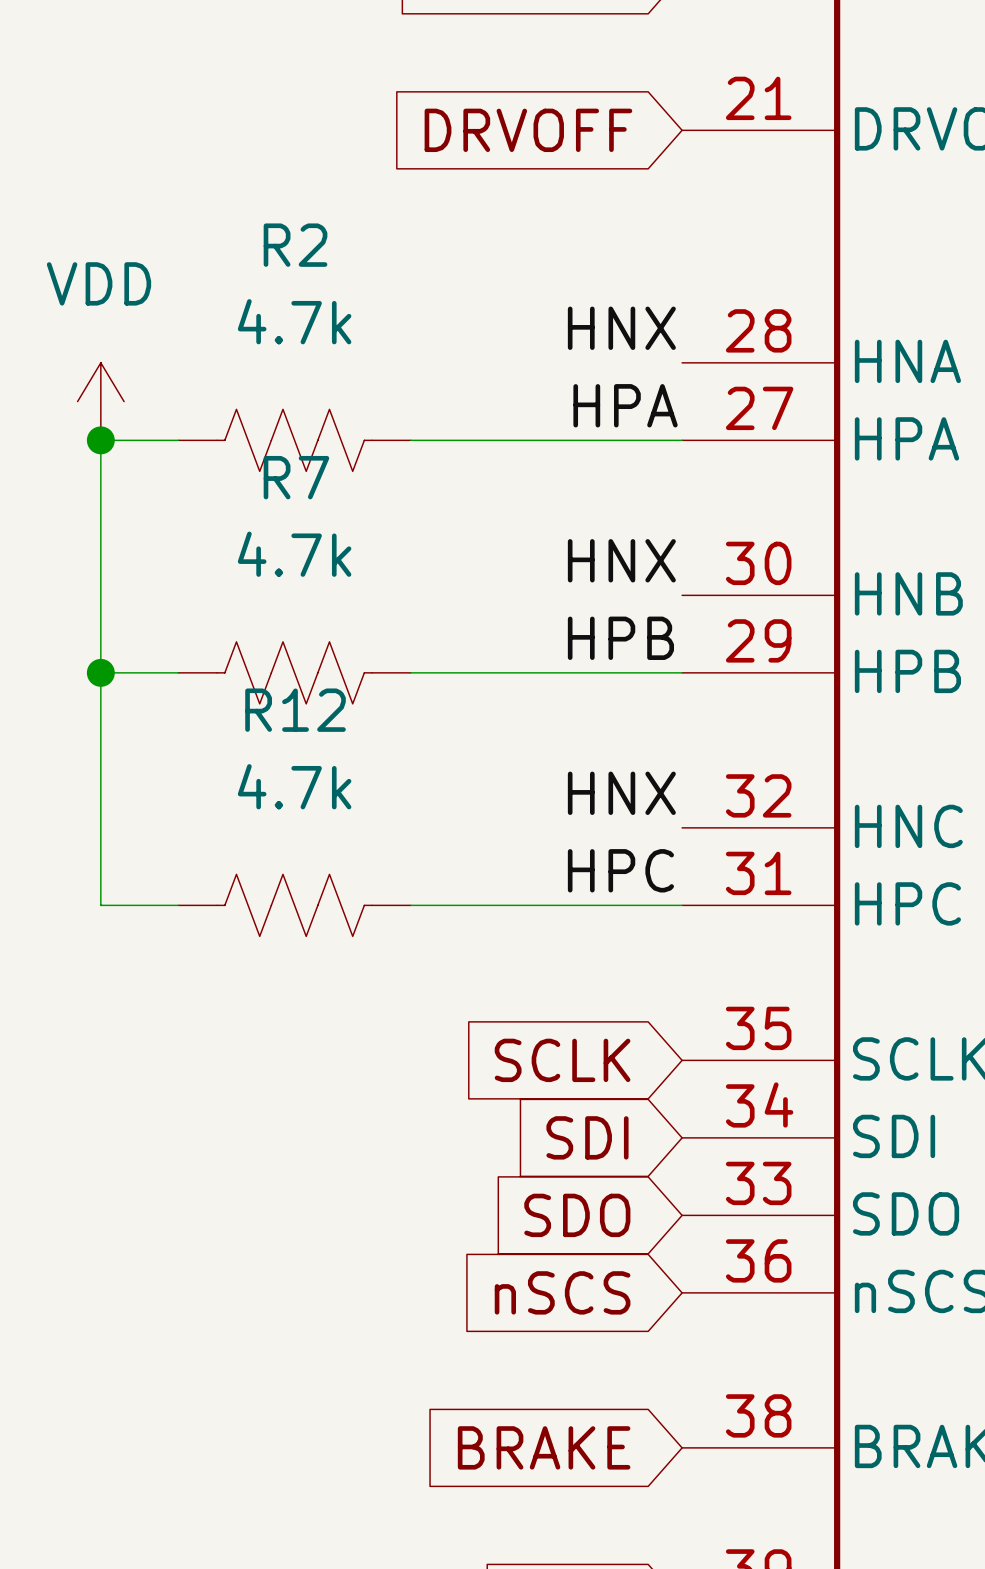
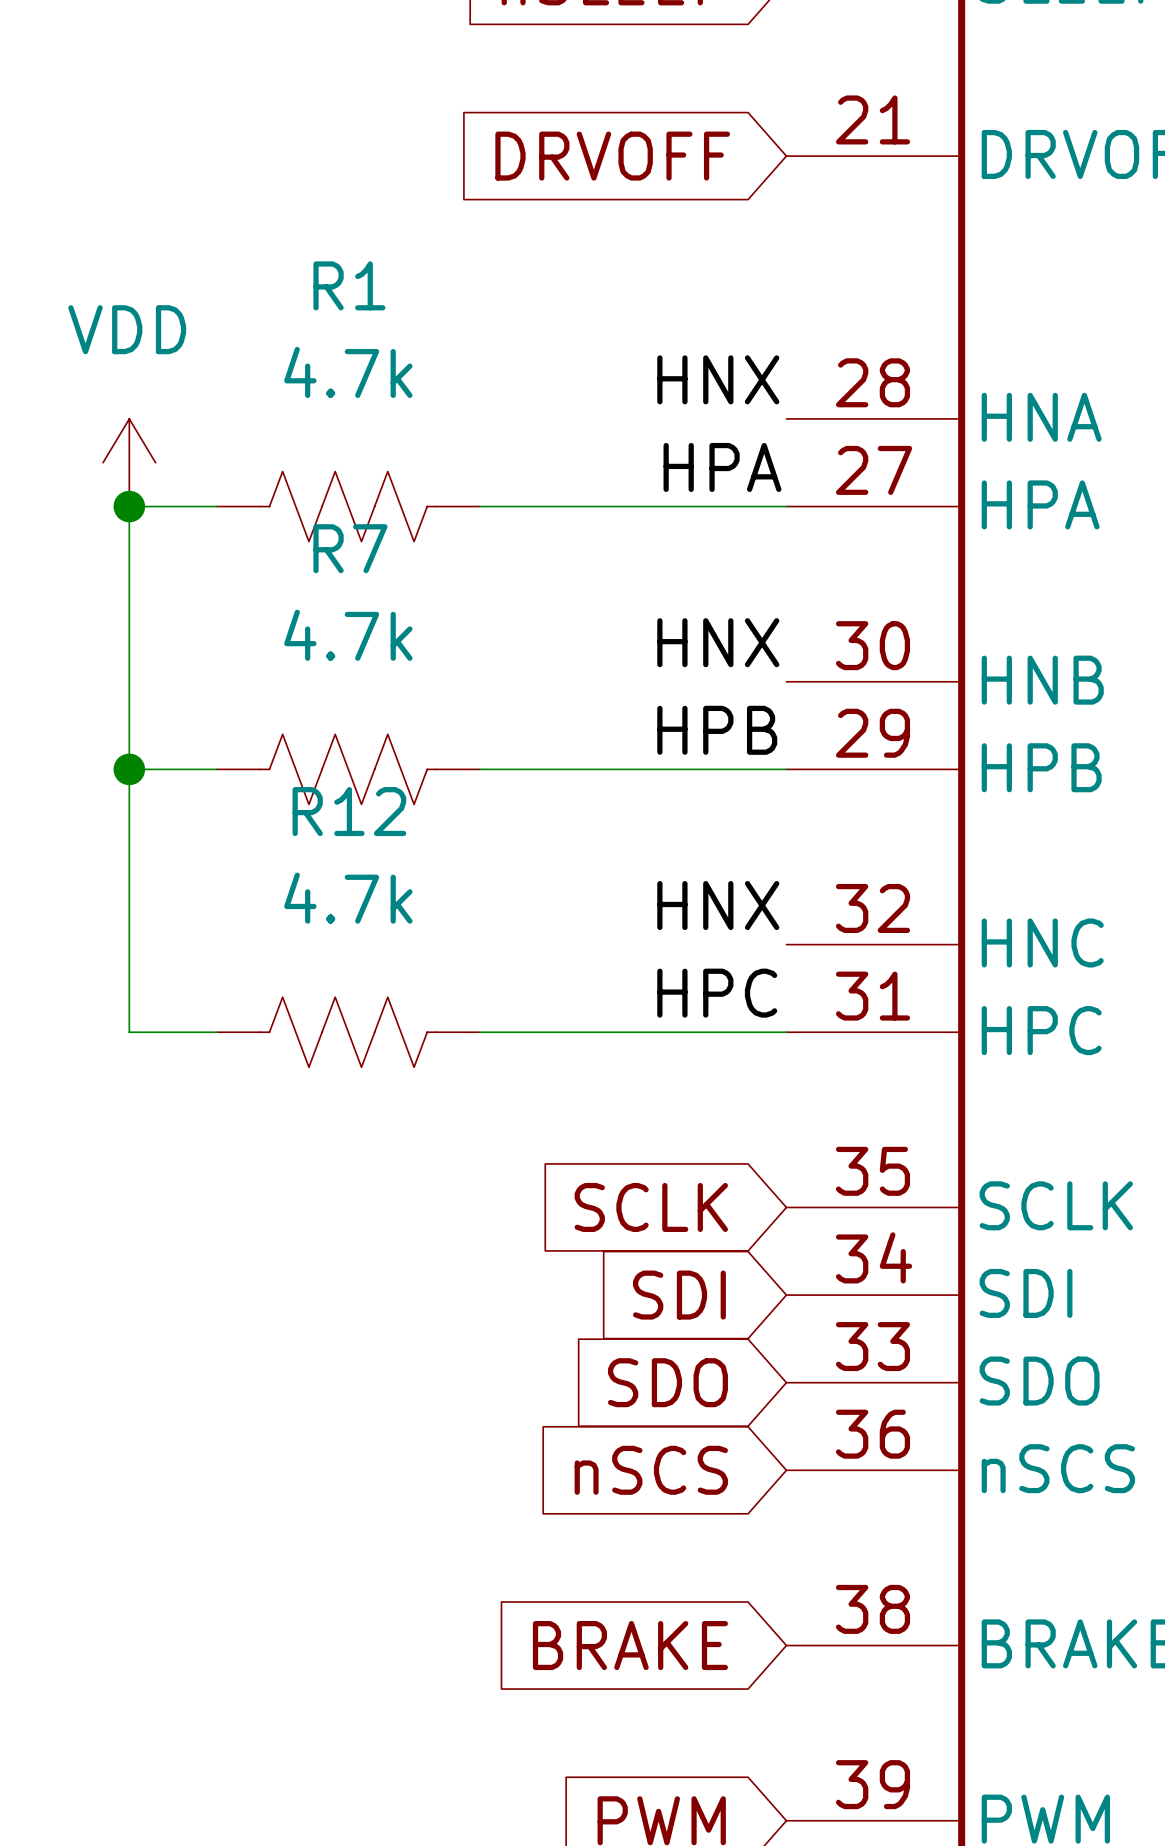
R2 name: R2 (295, 245) -> R1 (349, 285)

